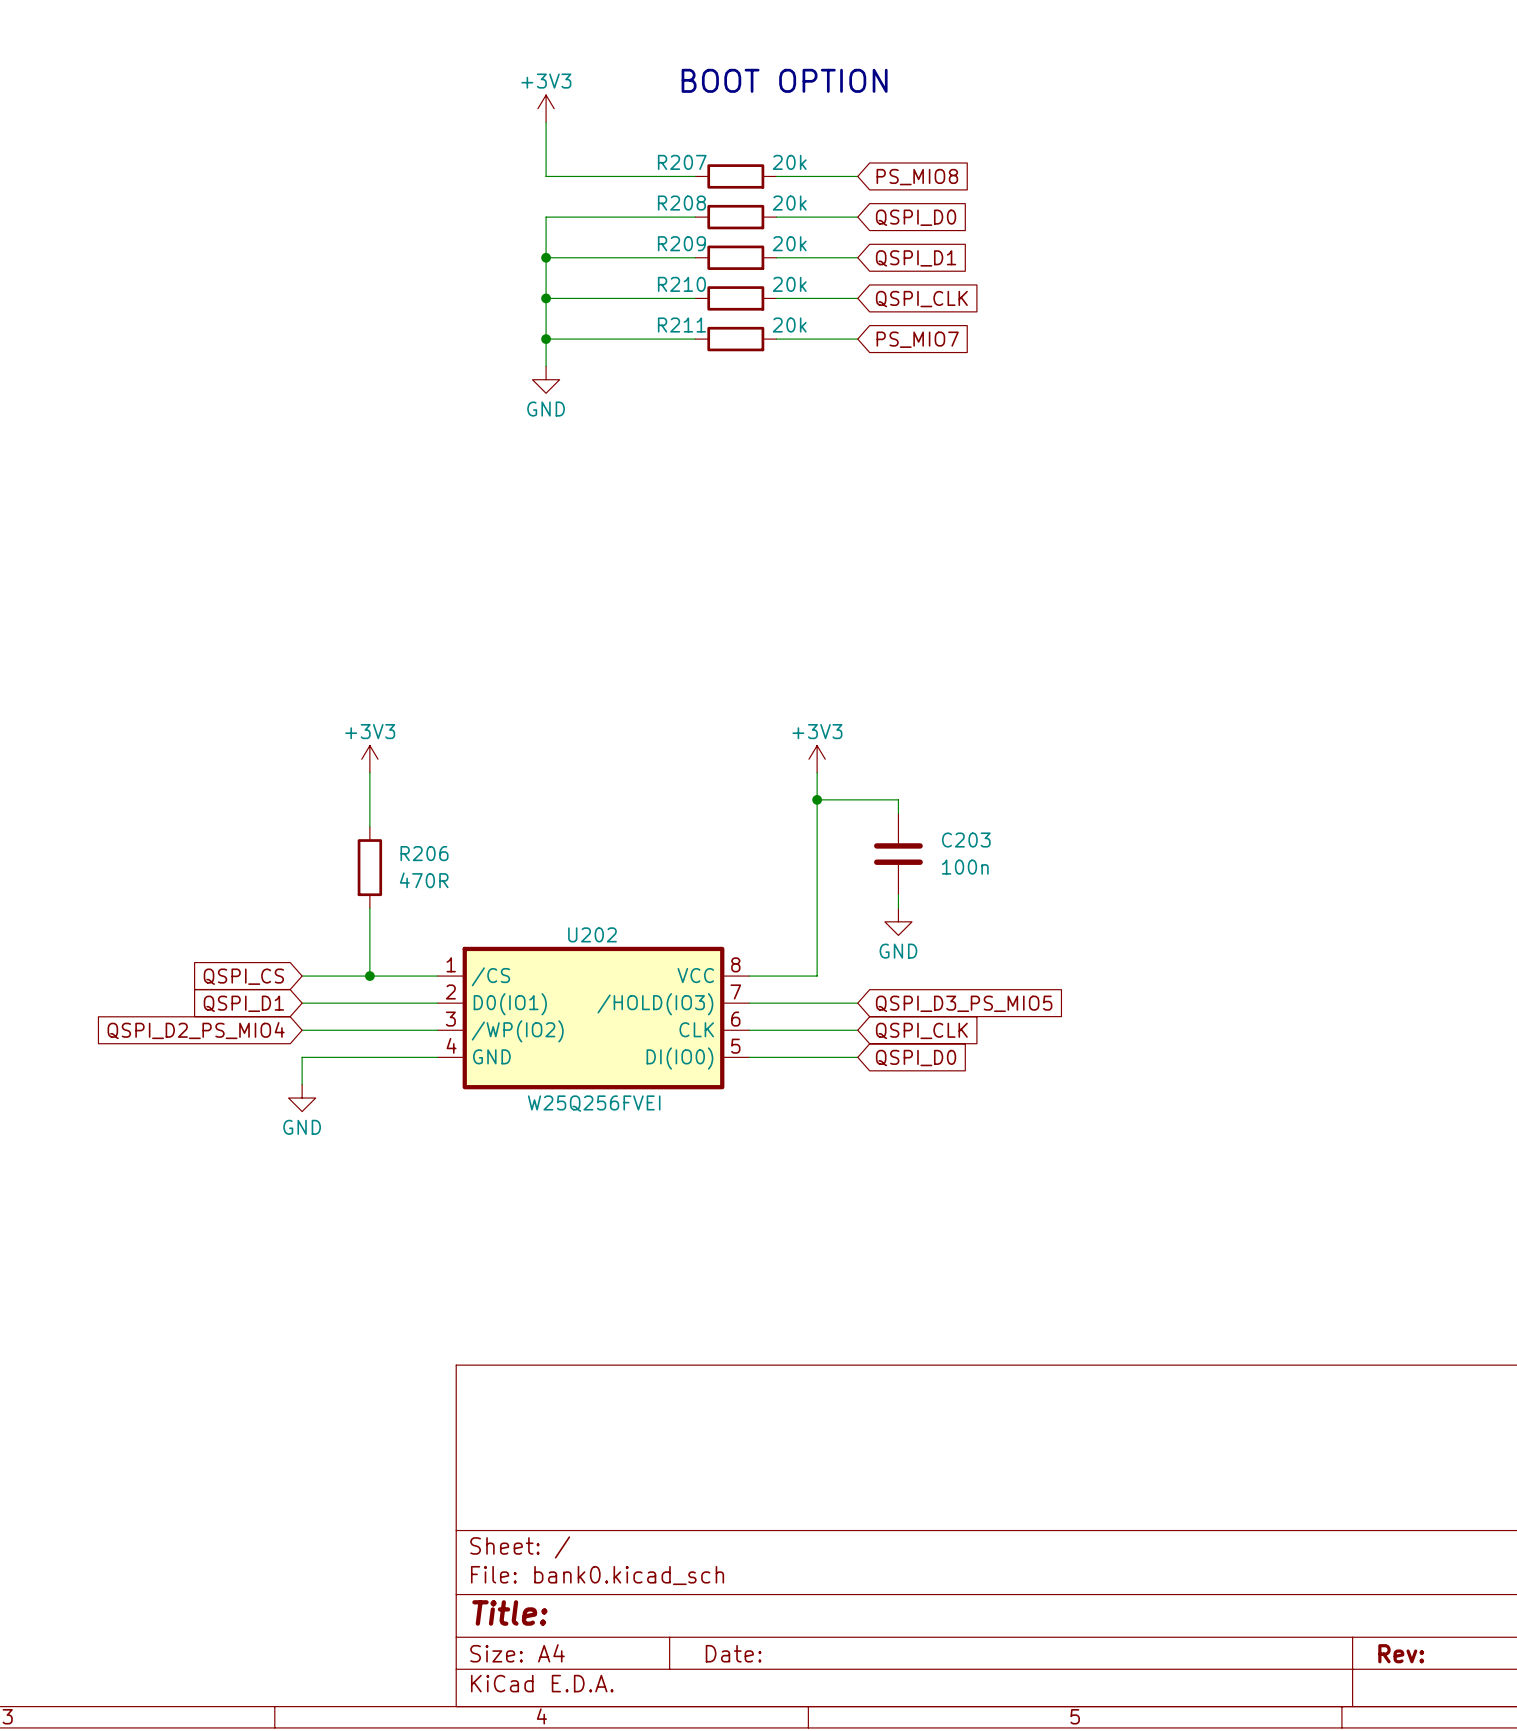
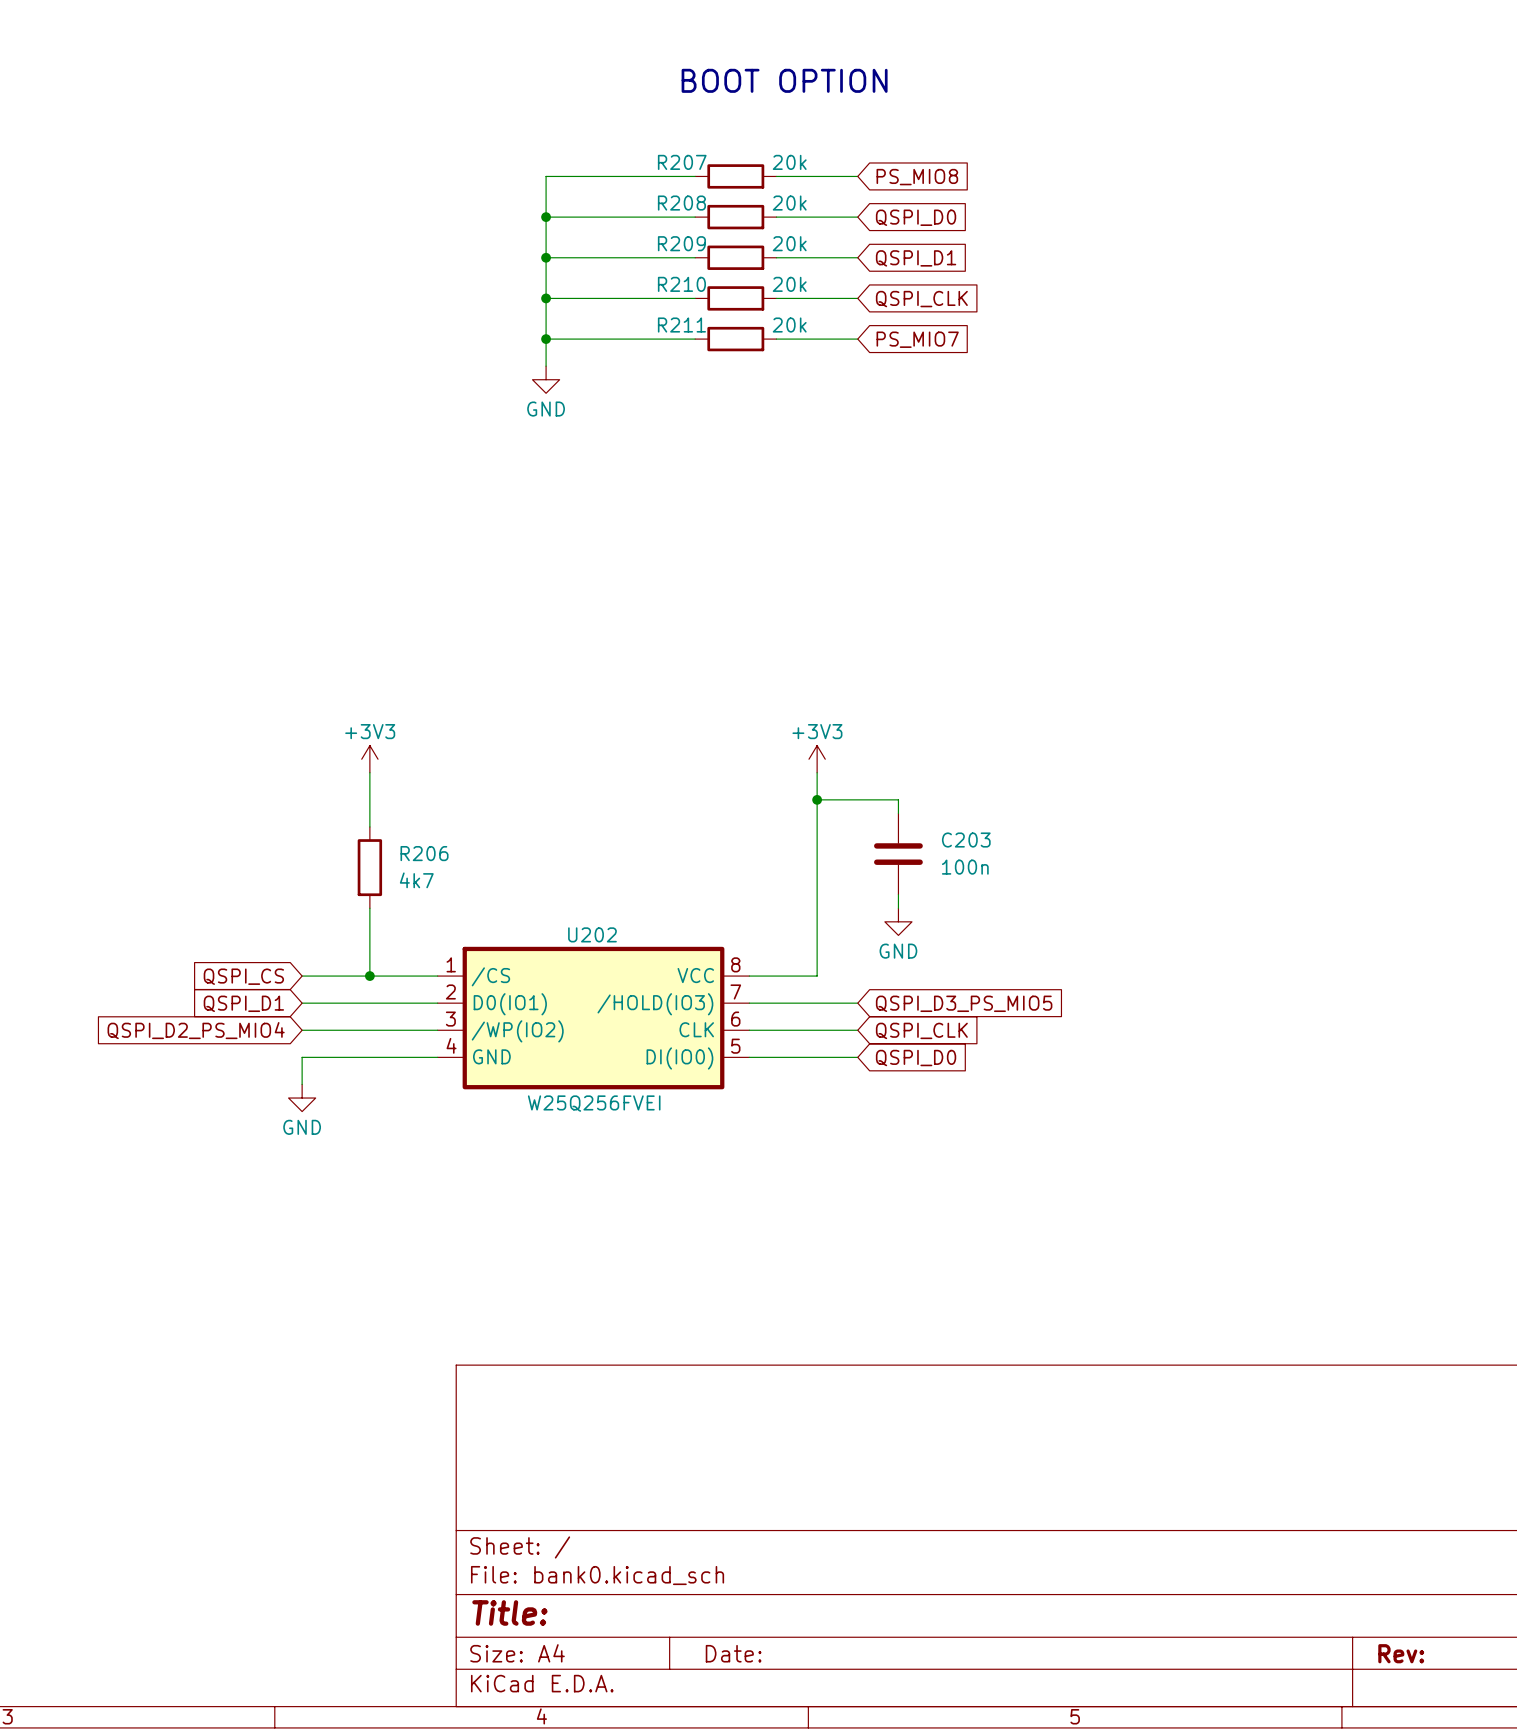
power symbol: +3V3 (546, 108) -> none
wire: (546, 122) (546, 176) -> (546, 217) (546, 176)
junction: none -> (546, 217)
R206 value: 470R (424, 880) -> 4k7 (416, 880)

